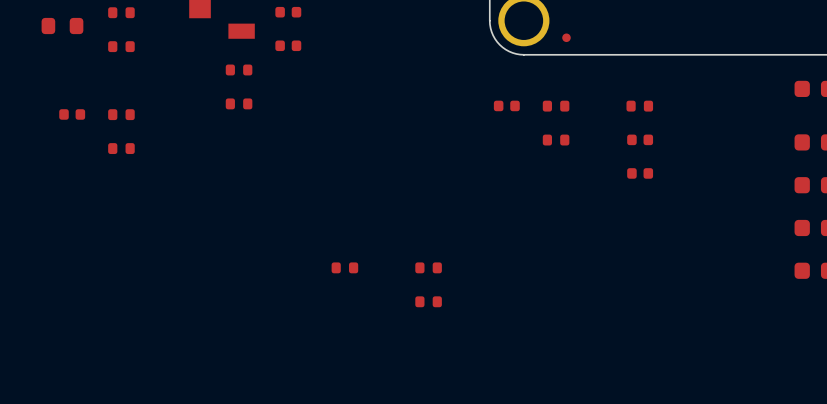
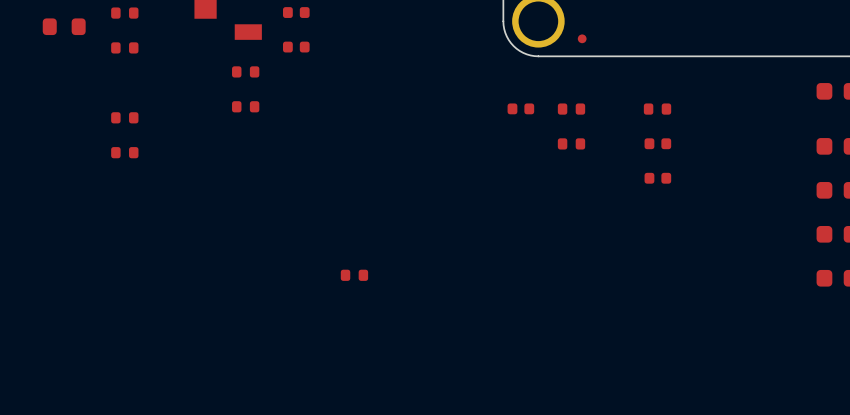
part: (72, 114) -> none
part: (428, 267) -> none
part: (428, 301) -> none

